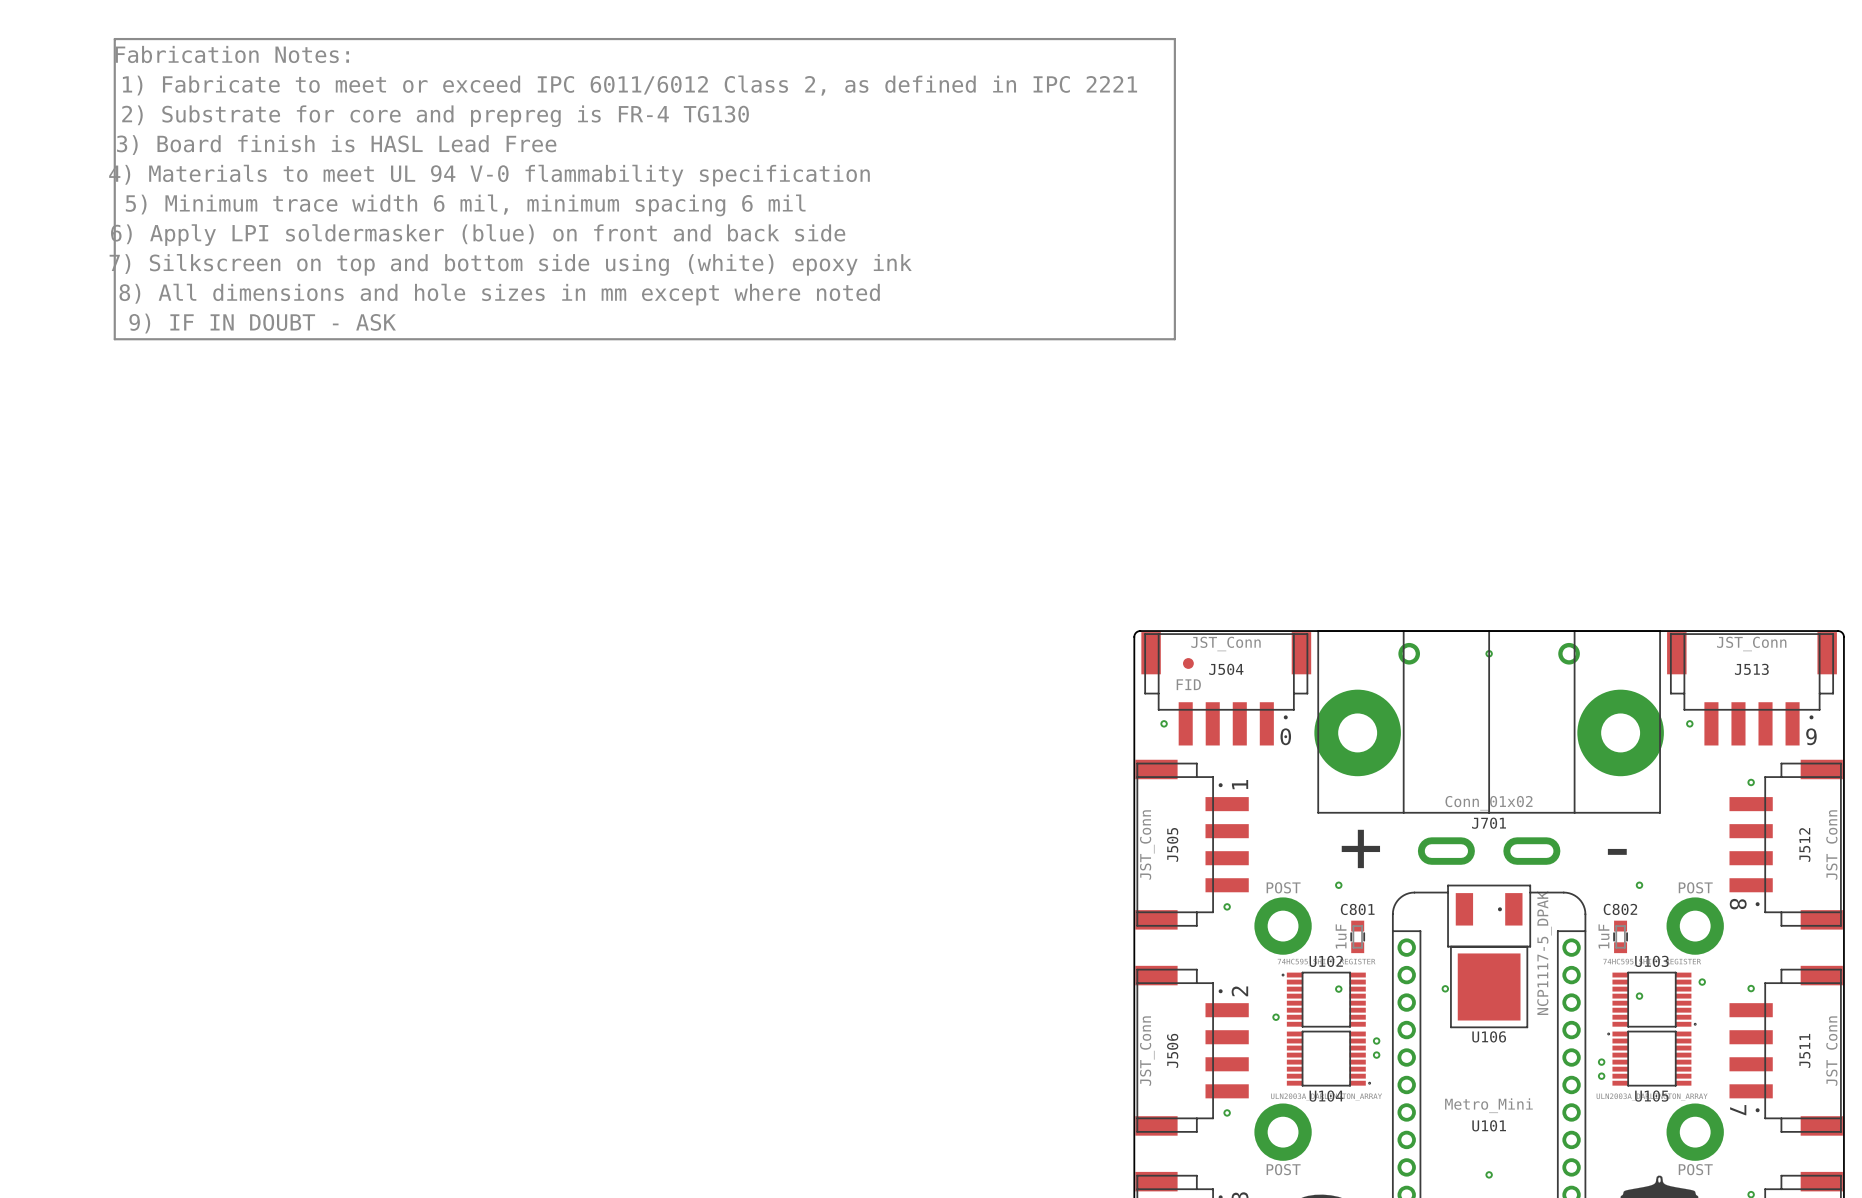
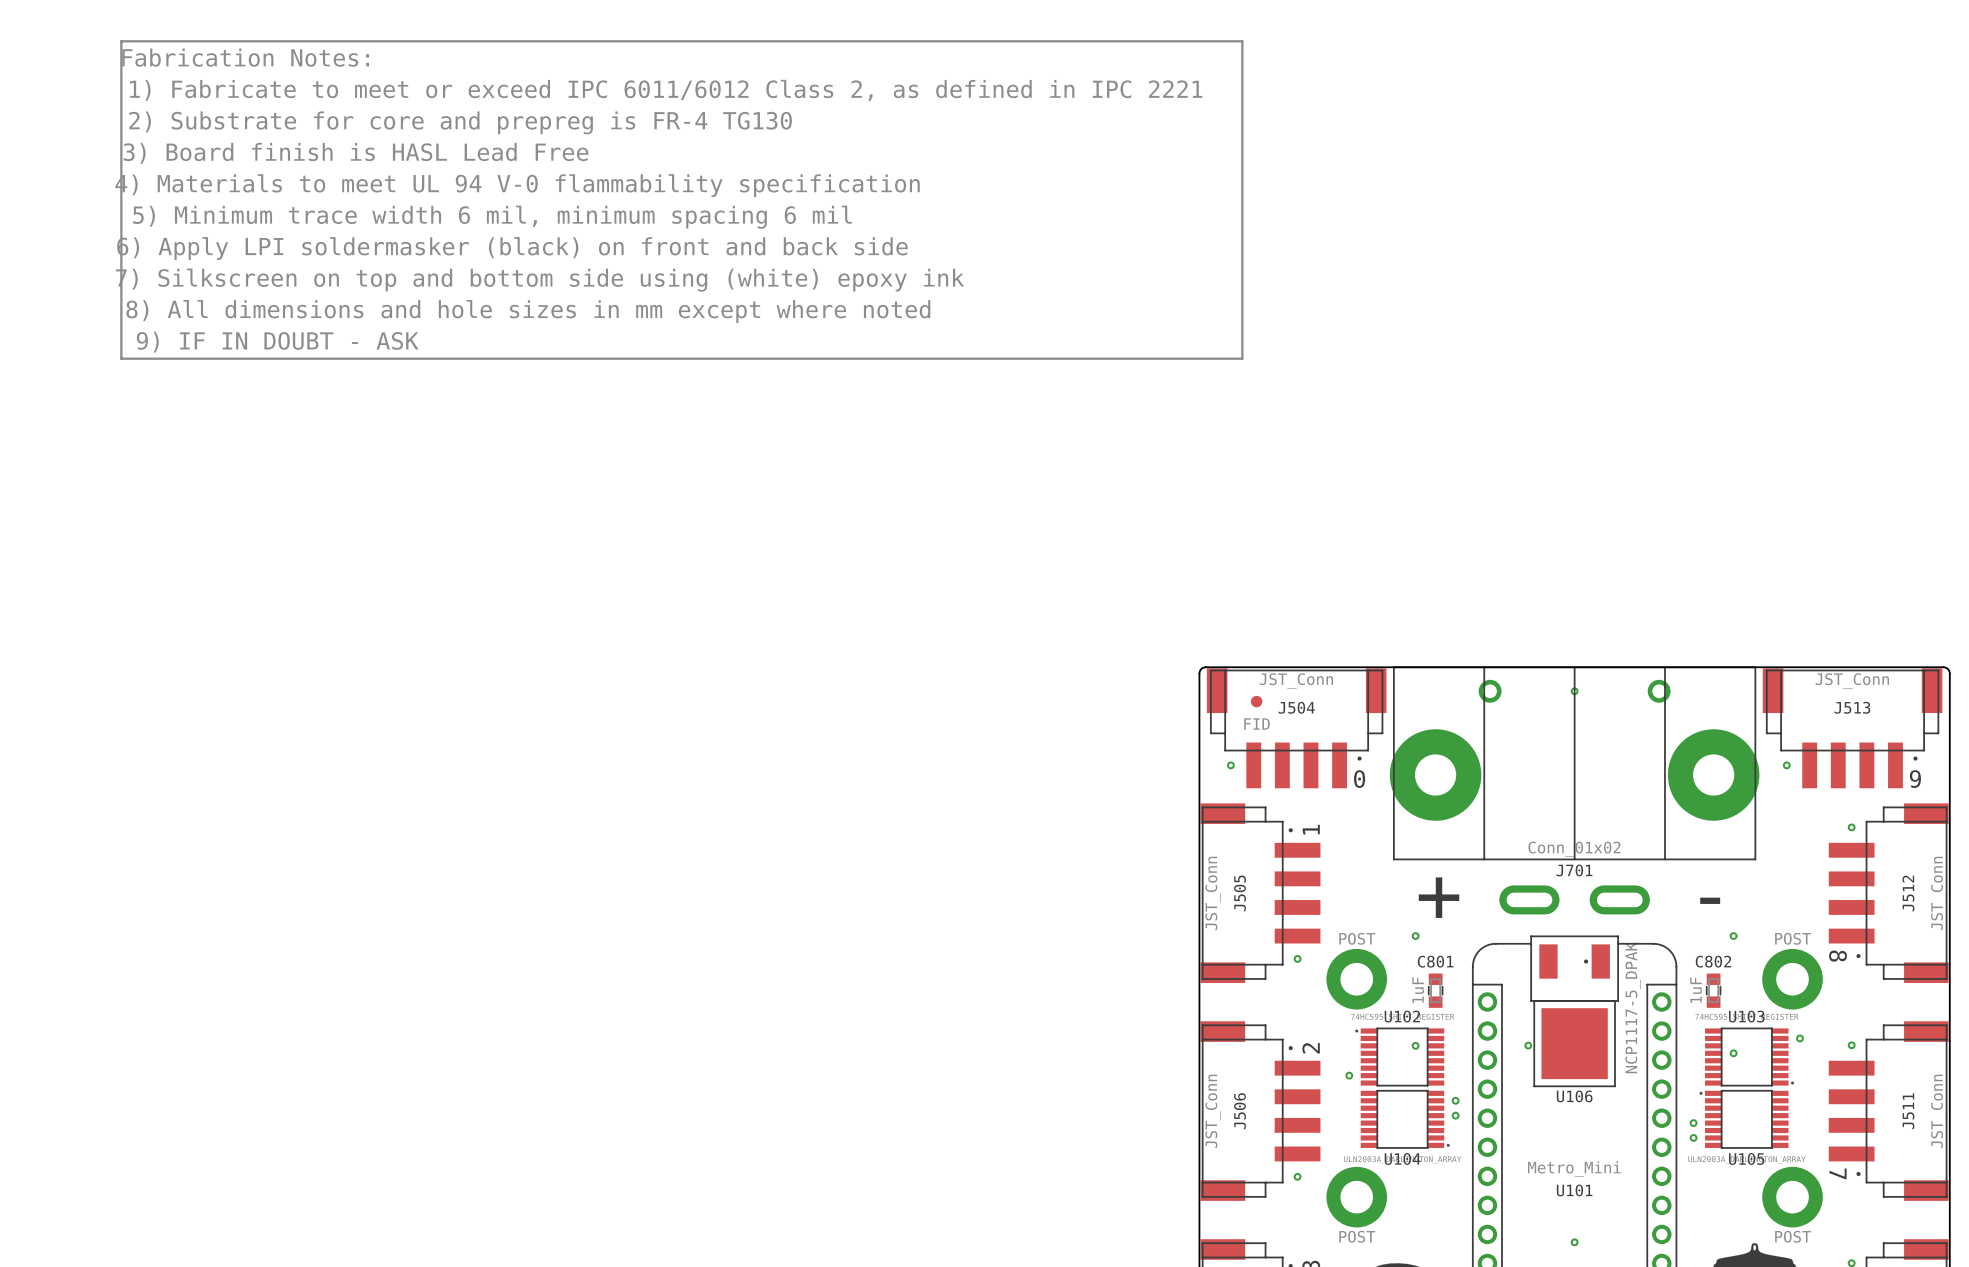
drawing shape: [109, 37, 1176, 341] -> [115, 40, 1244, 360]

